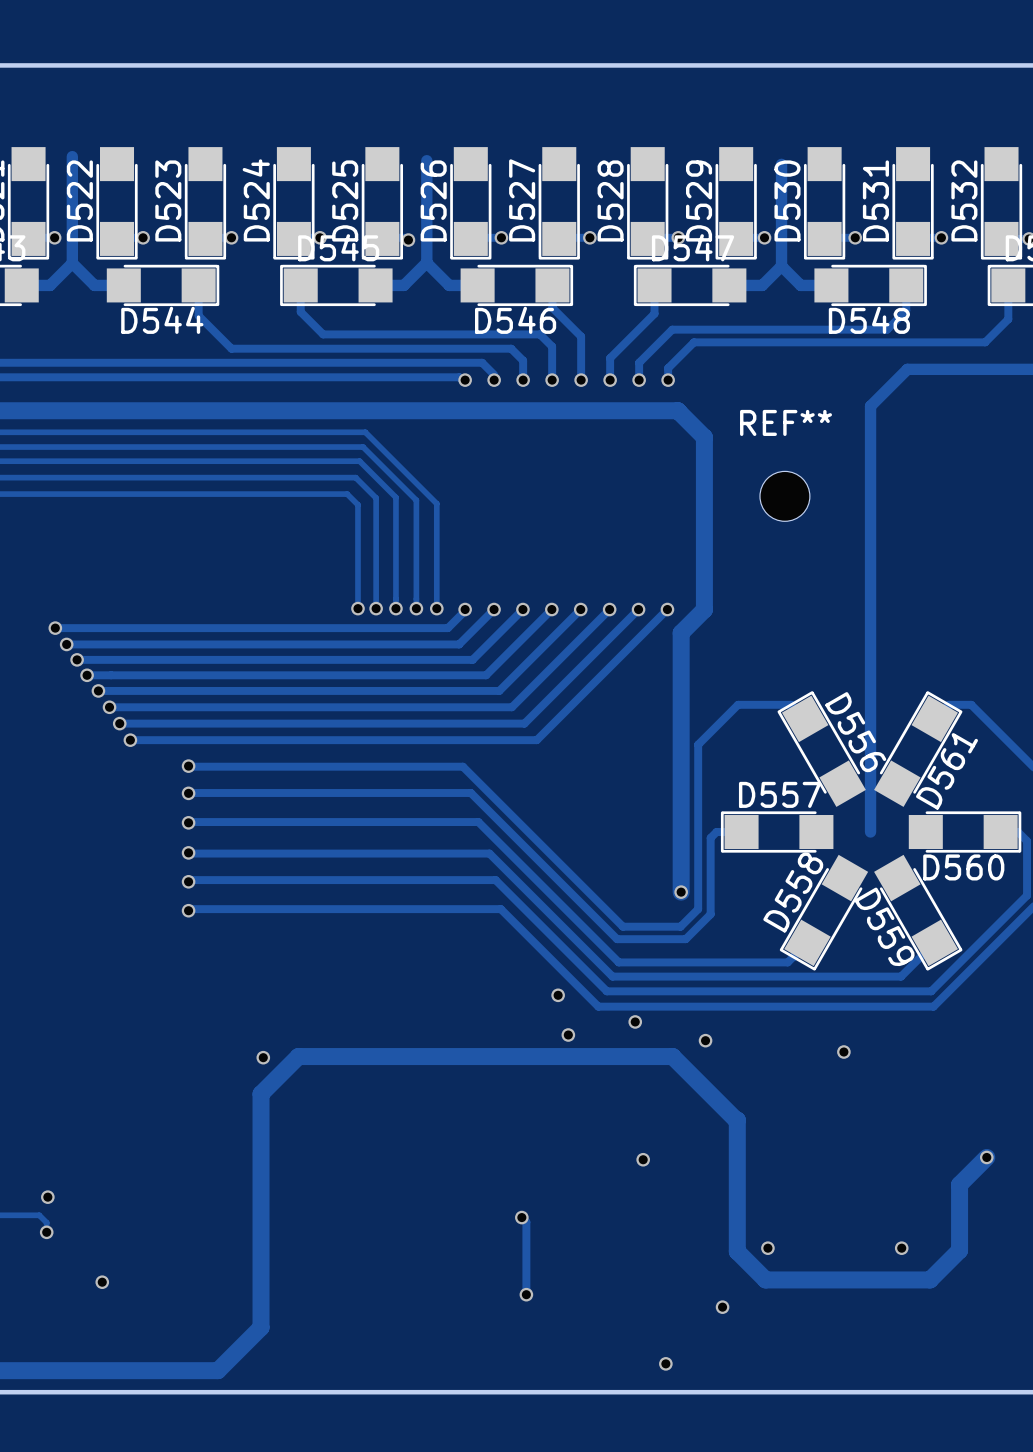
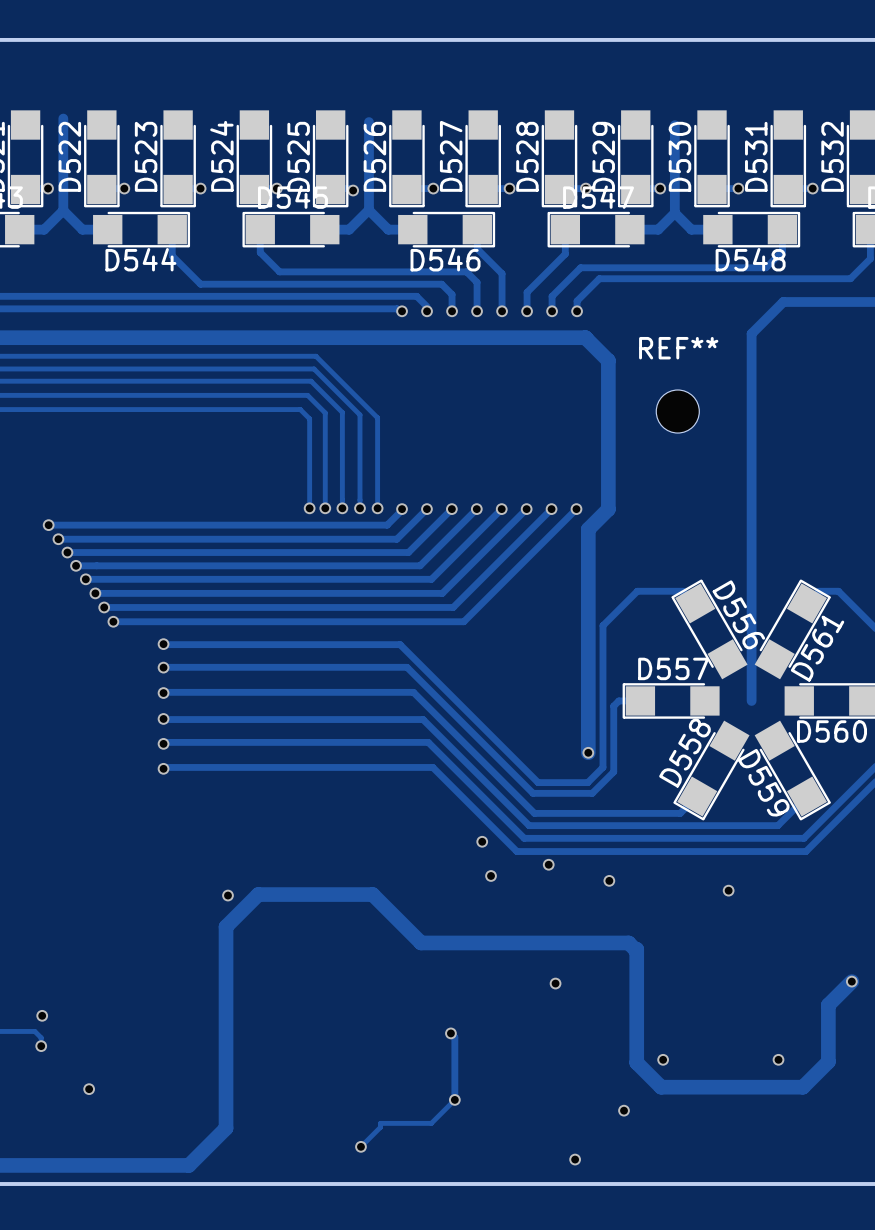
track: (431, 1056) (672, 1056) (736, 1120) -> (372, 894) (421, 942) (628, 942) (635, 949)
track: none -> (454, 1099) (431, 1123) (380, 1123) (380, 1127) (360, 1146)
via: none -> (360, 1146)

